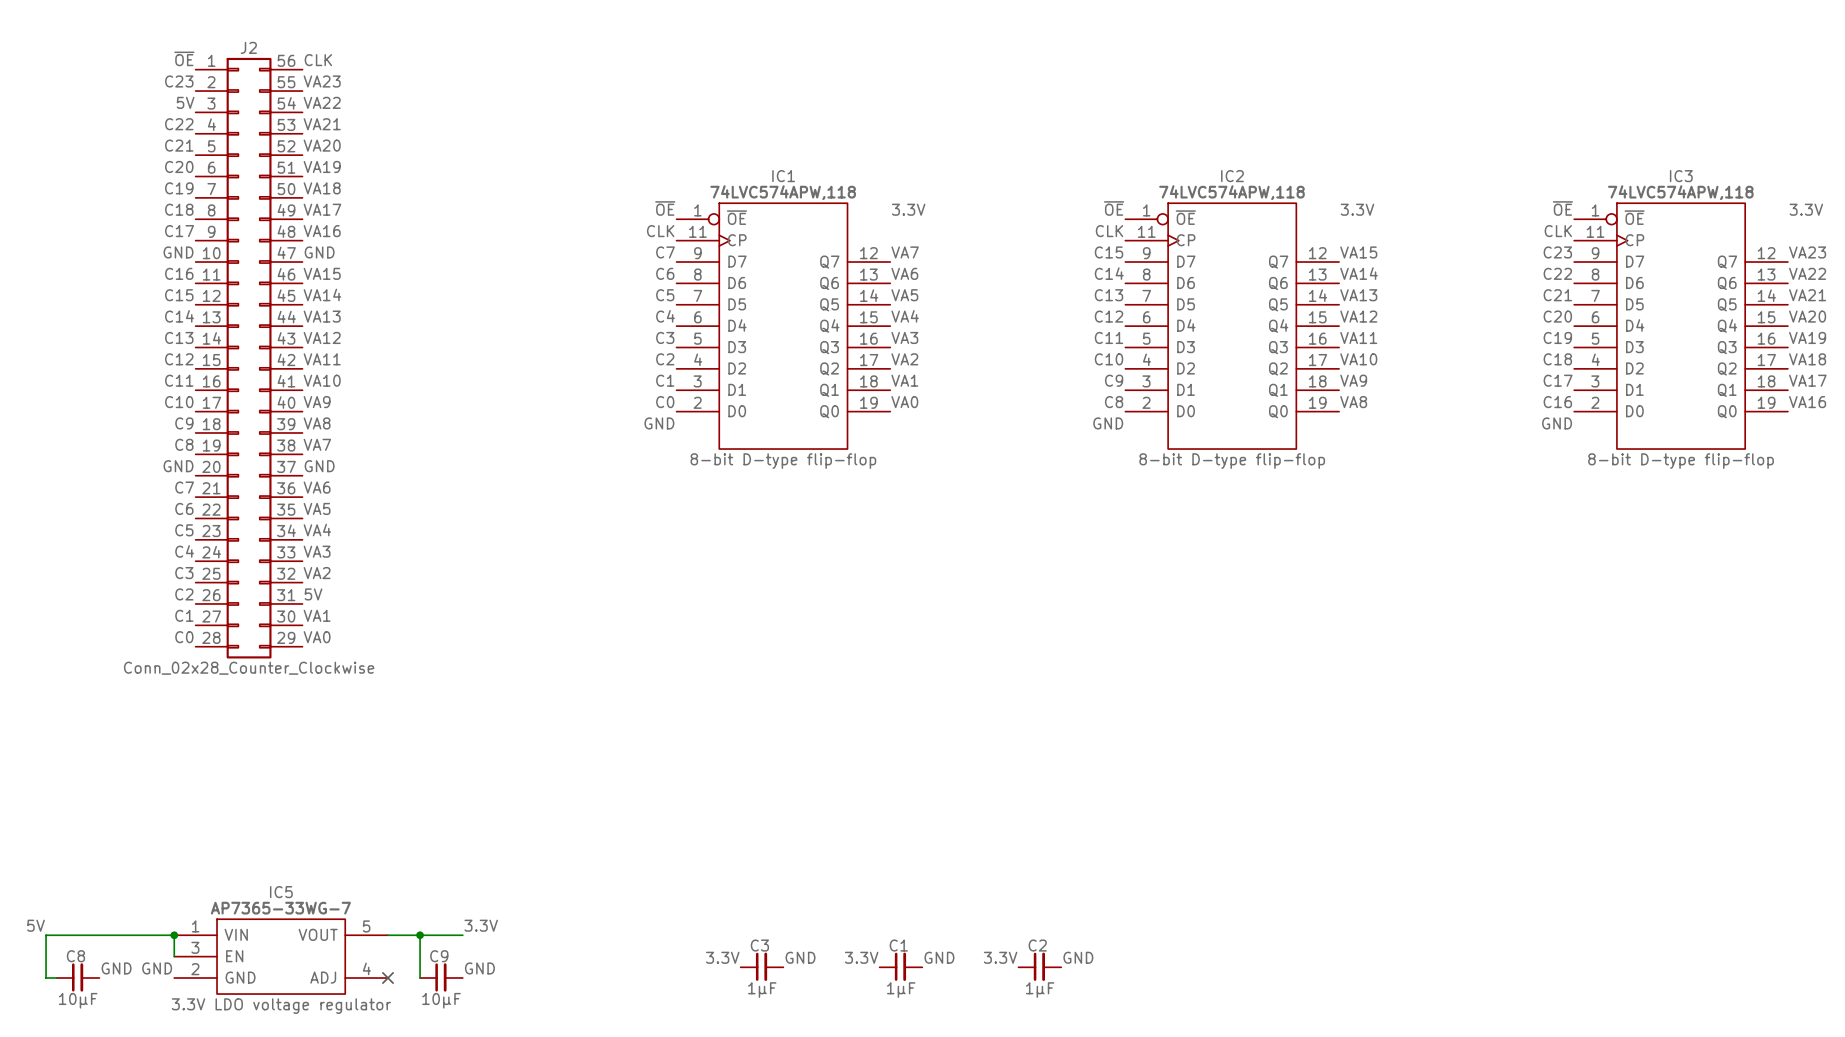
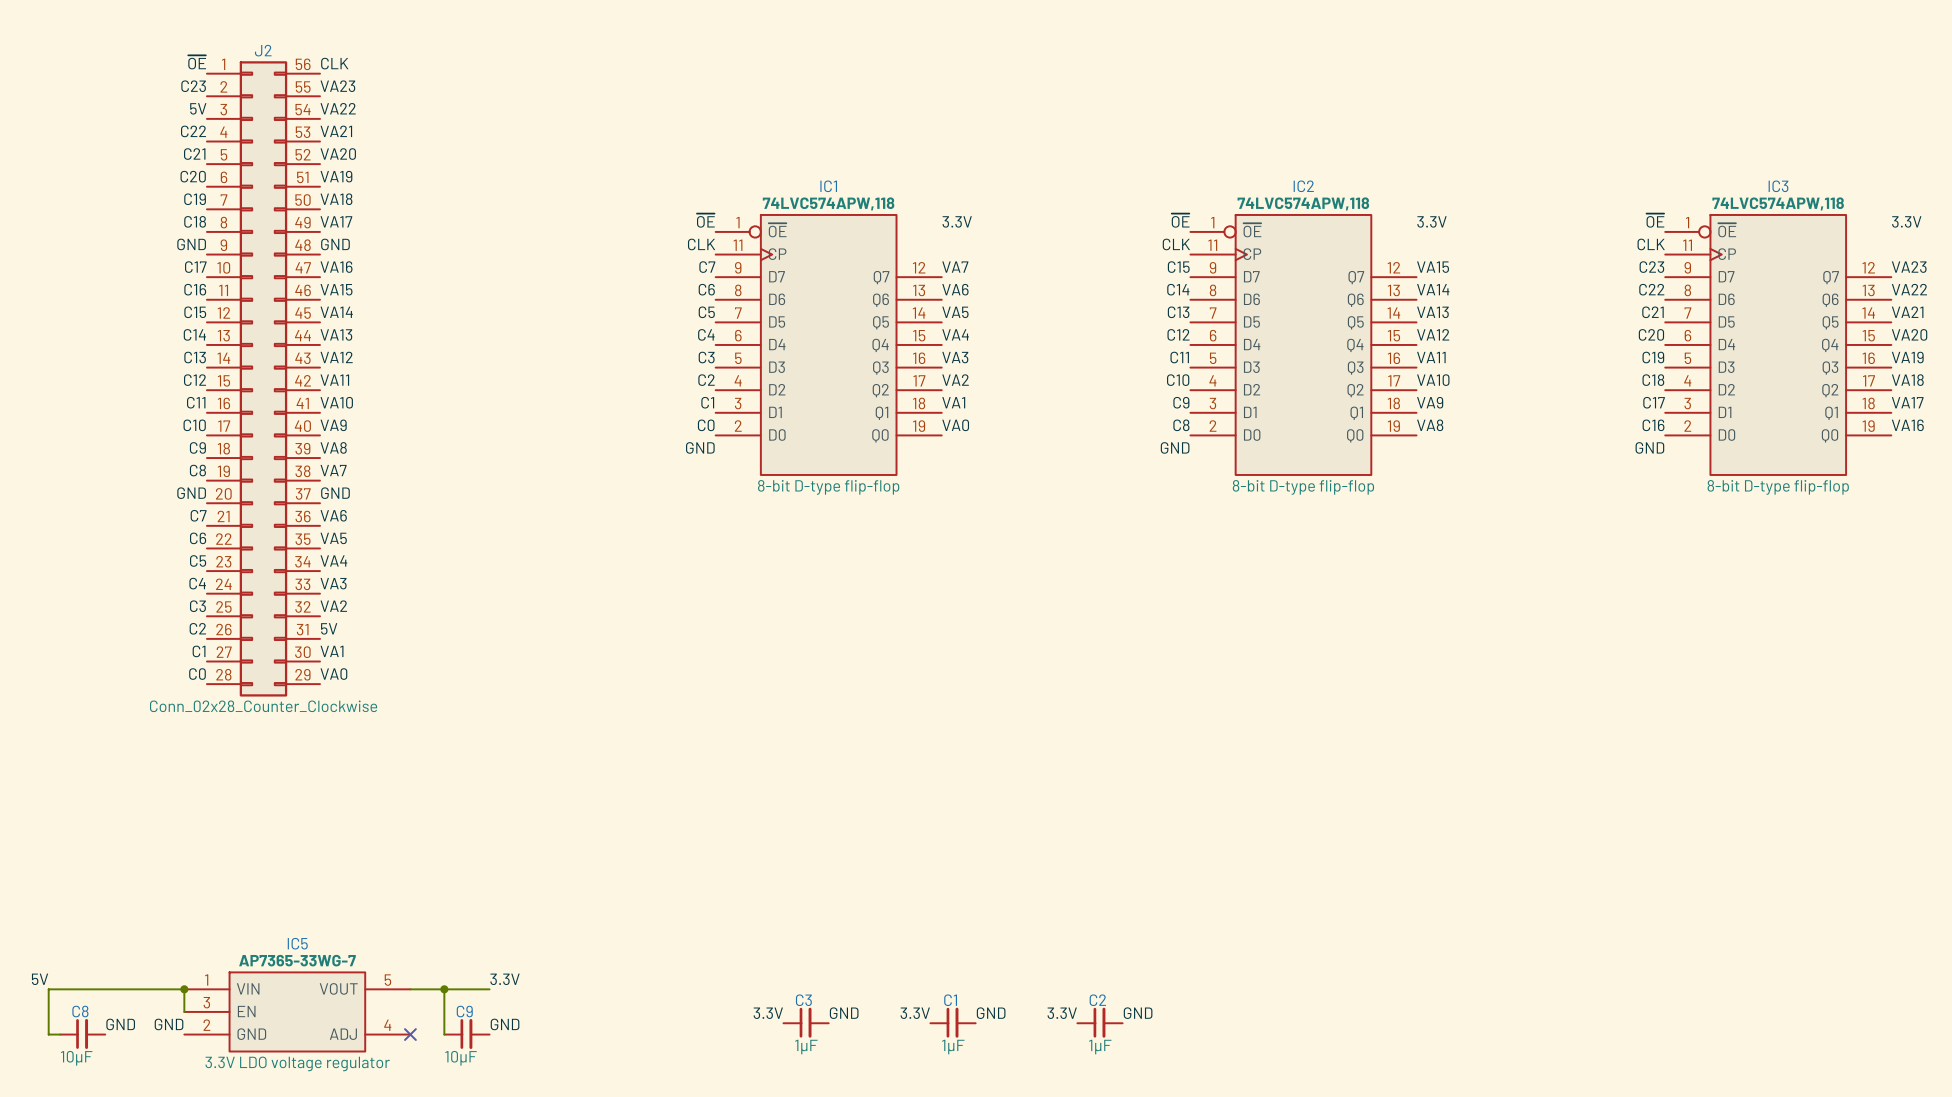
label: C17 (179, 231) -> GND (191, 244)
label: VA16 (322, 231) -> GND (335, 244)
label: GND (178, 252) -> C17 (195, 267)
label: GND (319, 252) -> VA16 (336, 267)

